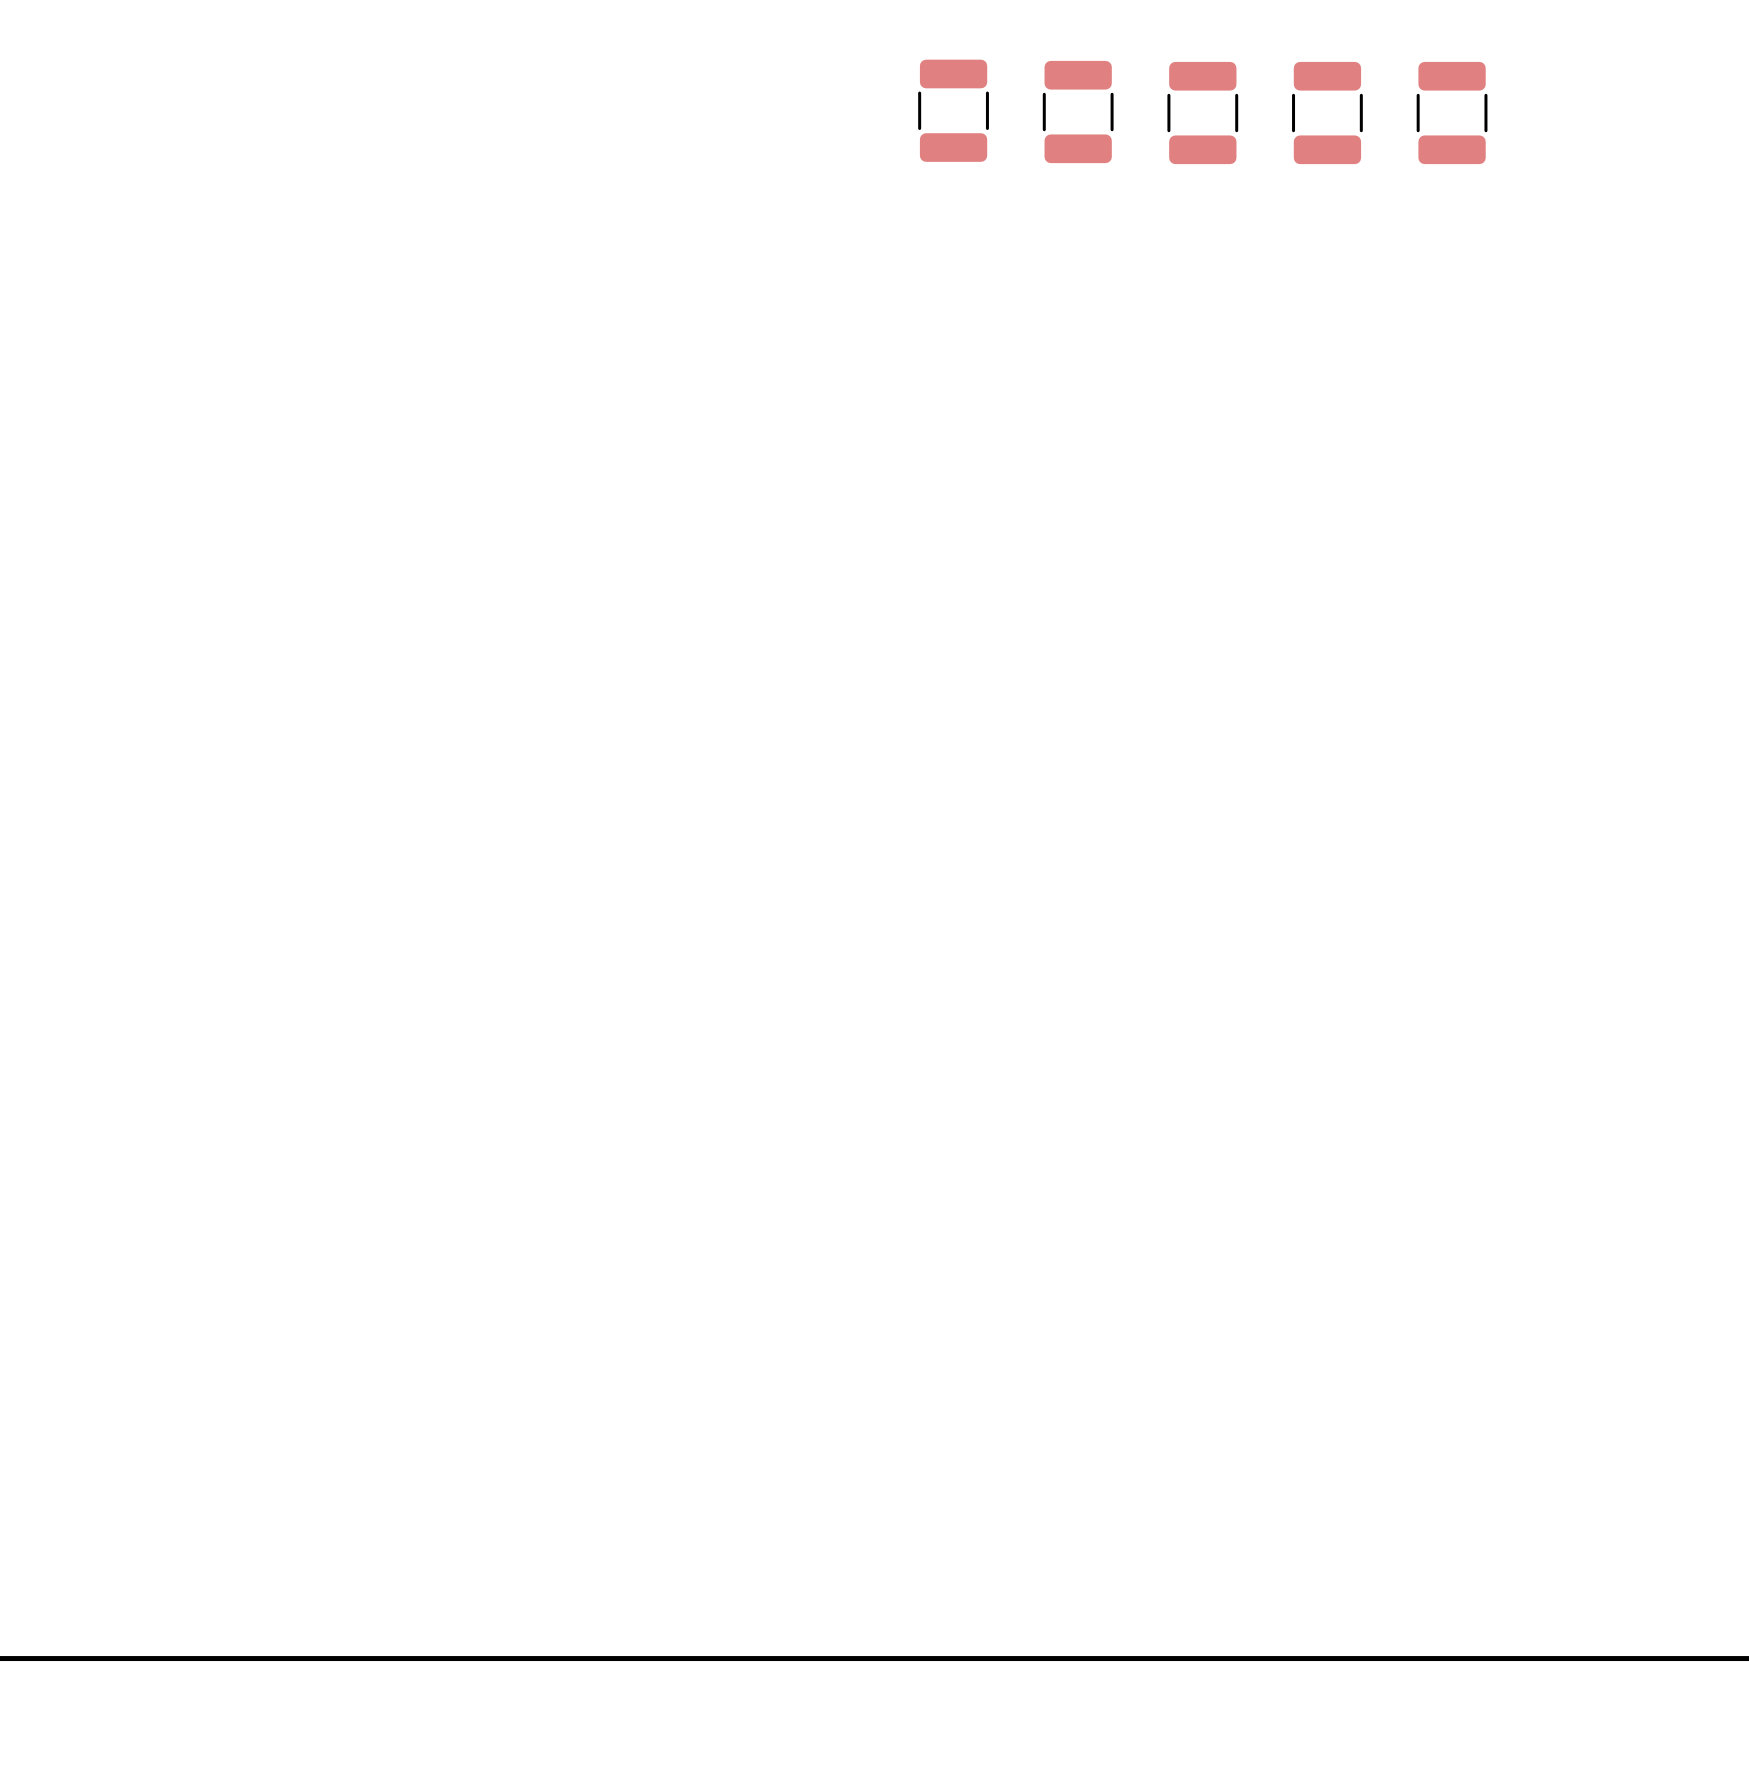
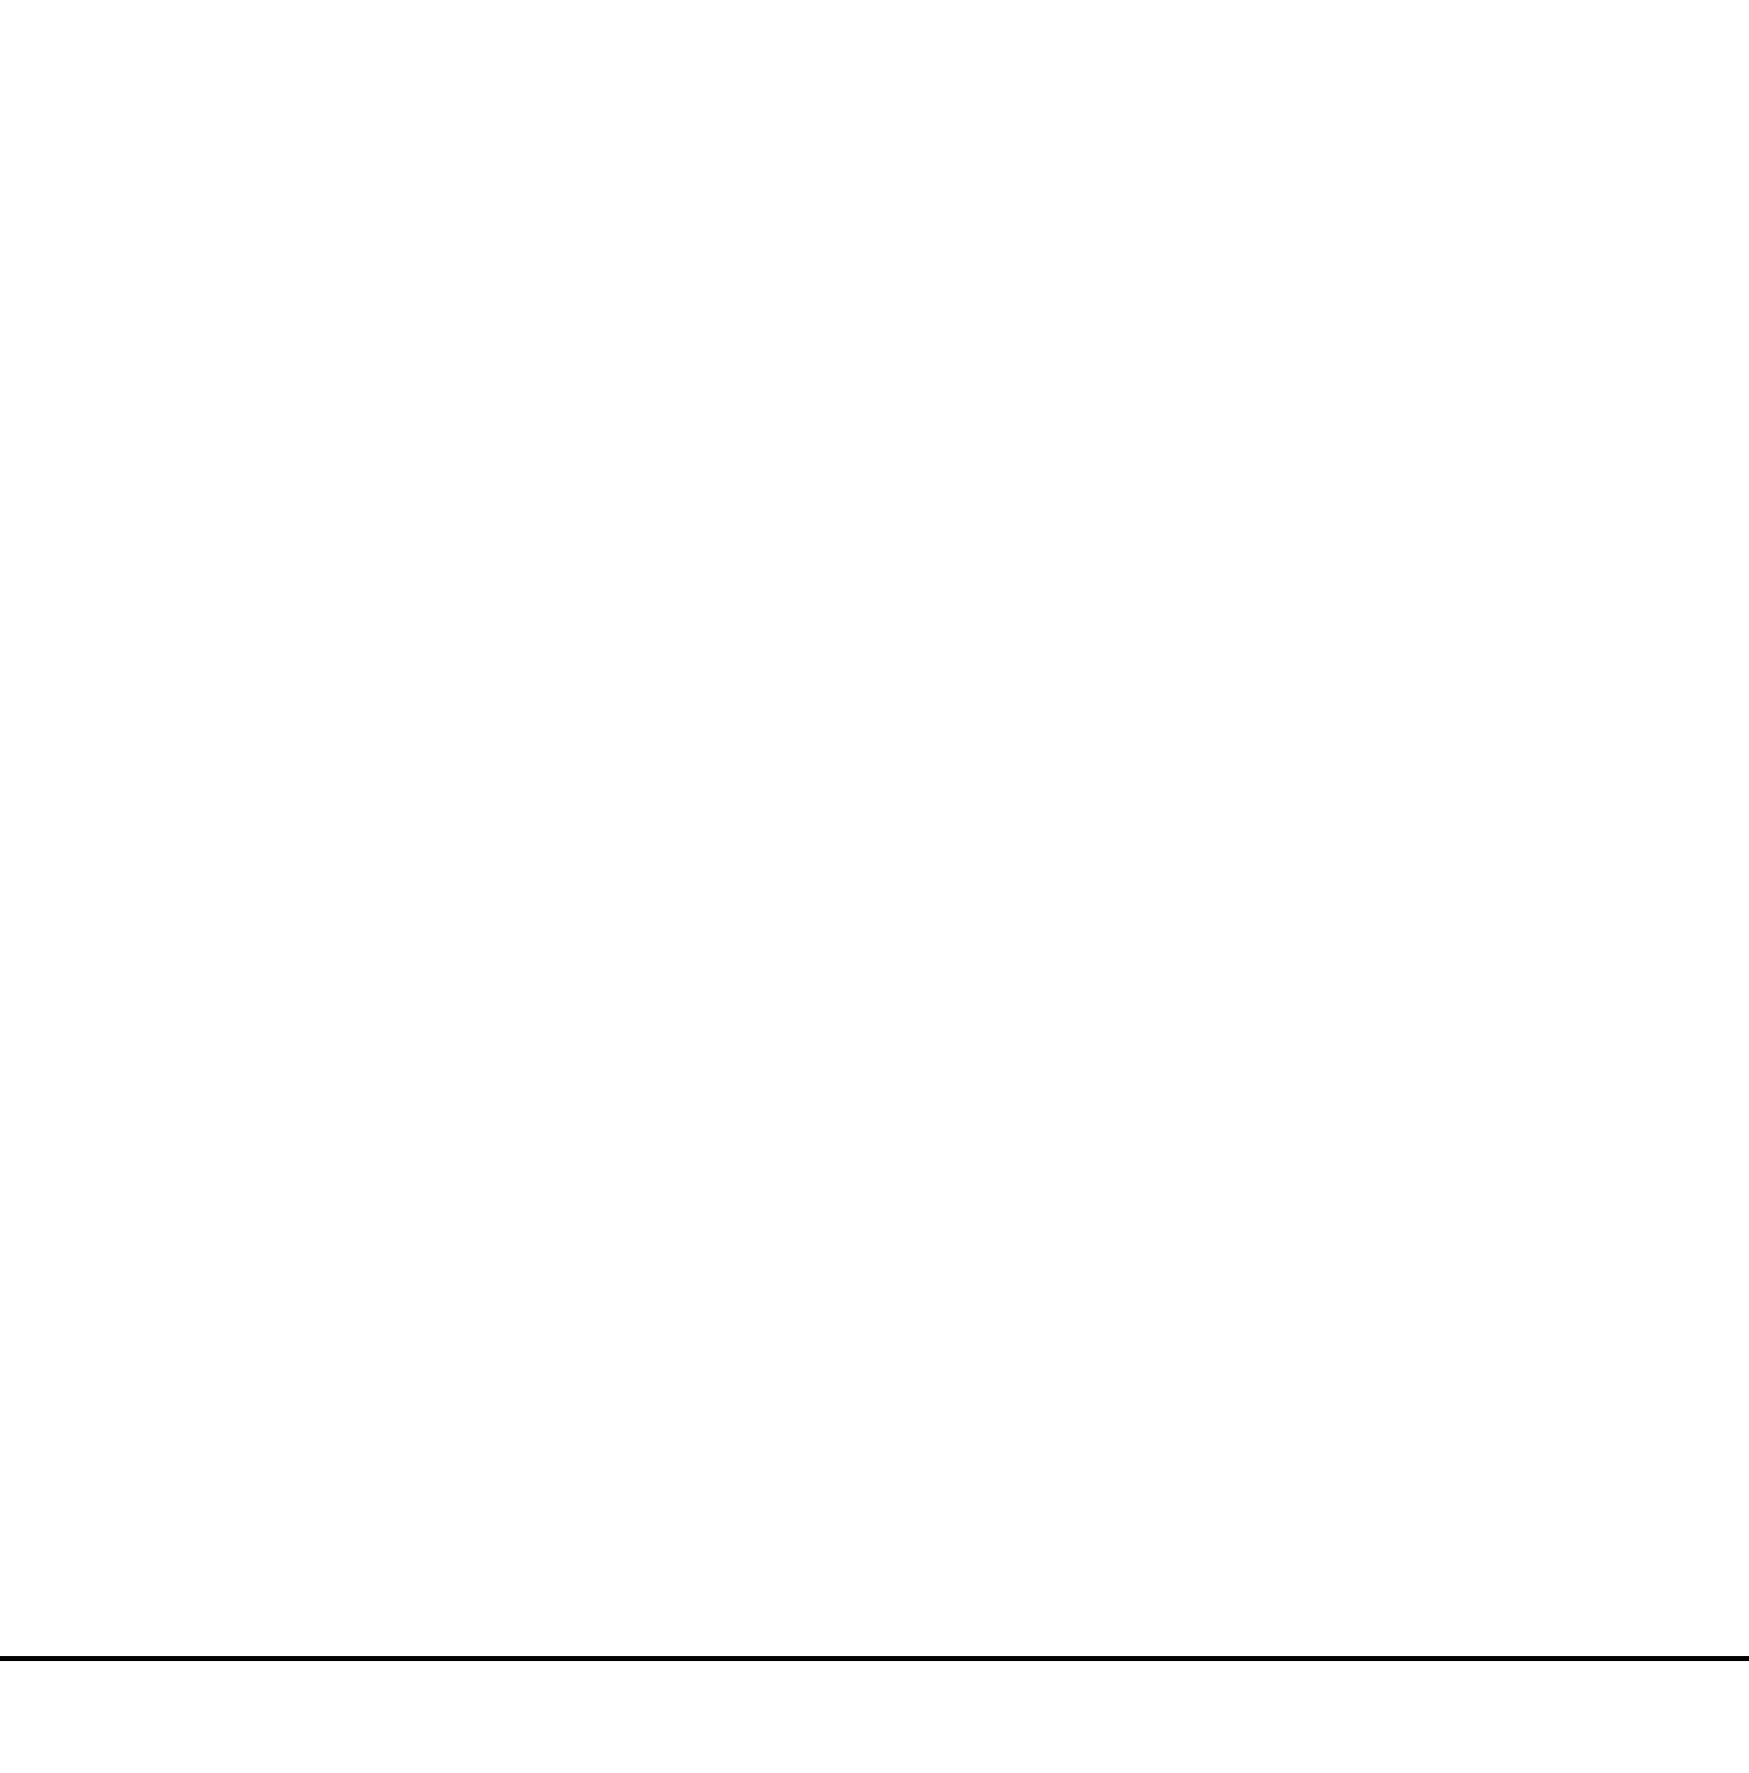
part: (953, 110) -> none
part: (1078, 112) -> none
part: (1202, 113) -> none
part: (1327, 113) -> none
part: (1452, 113) -> none

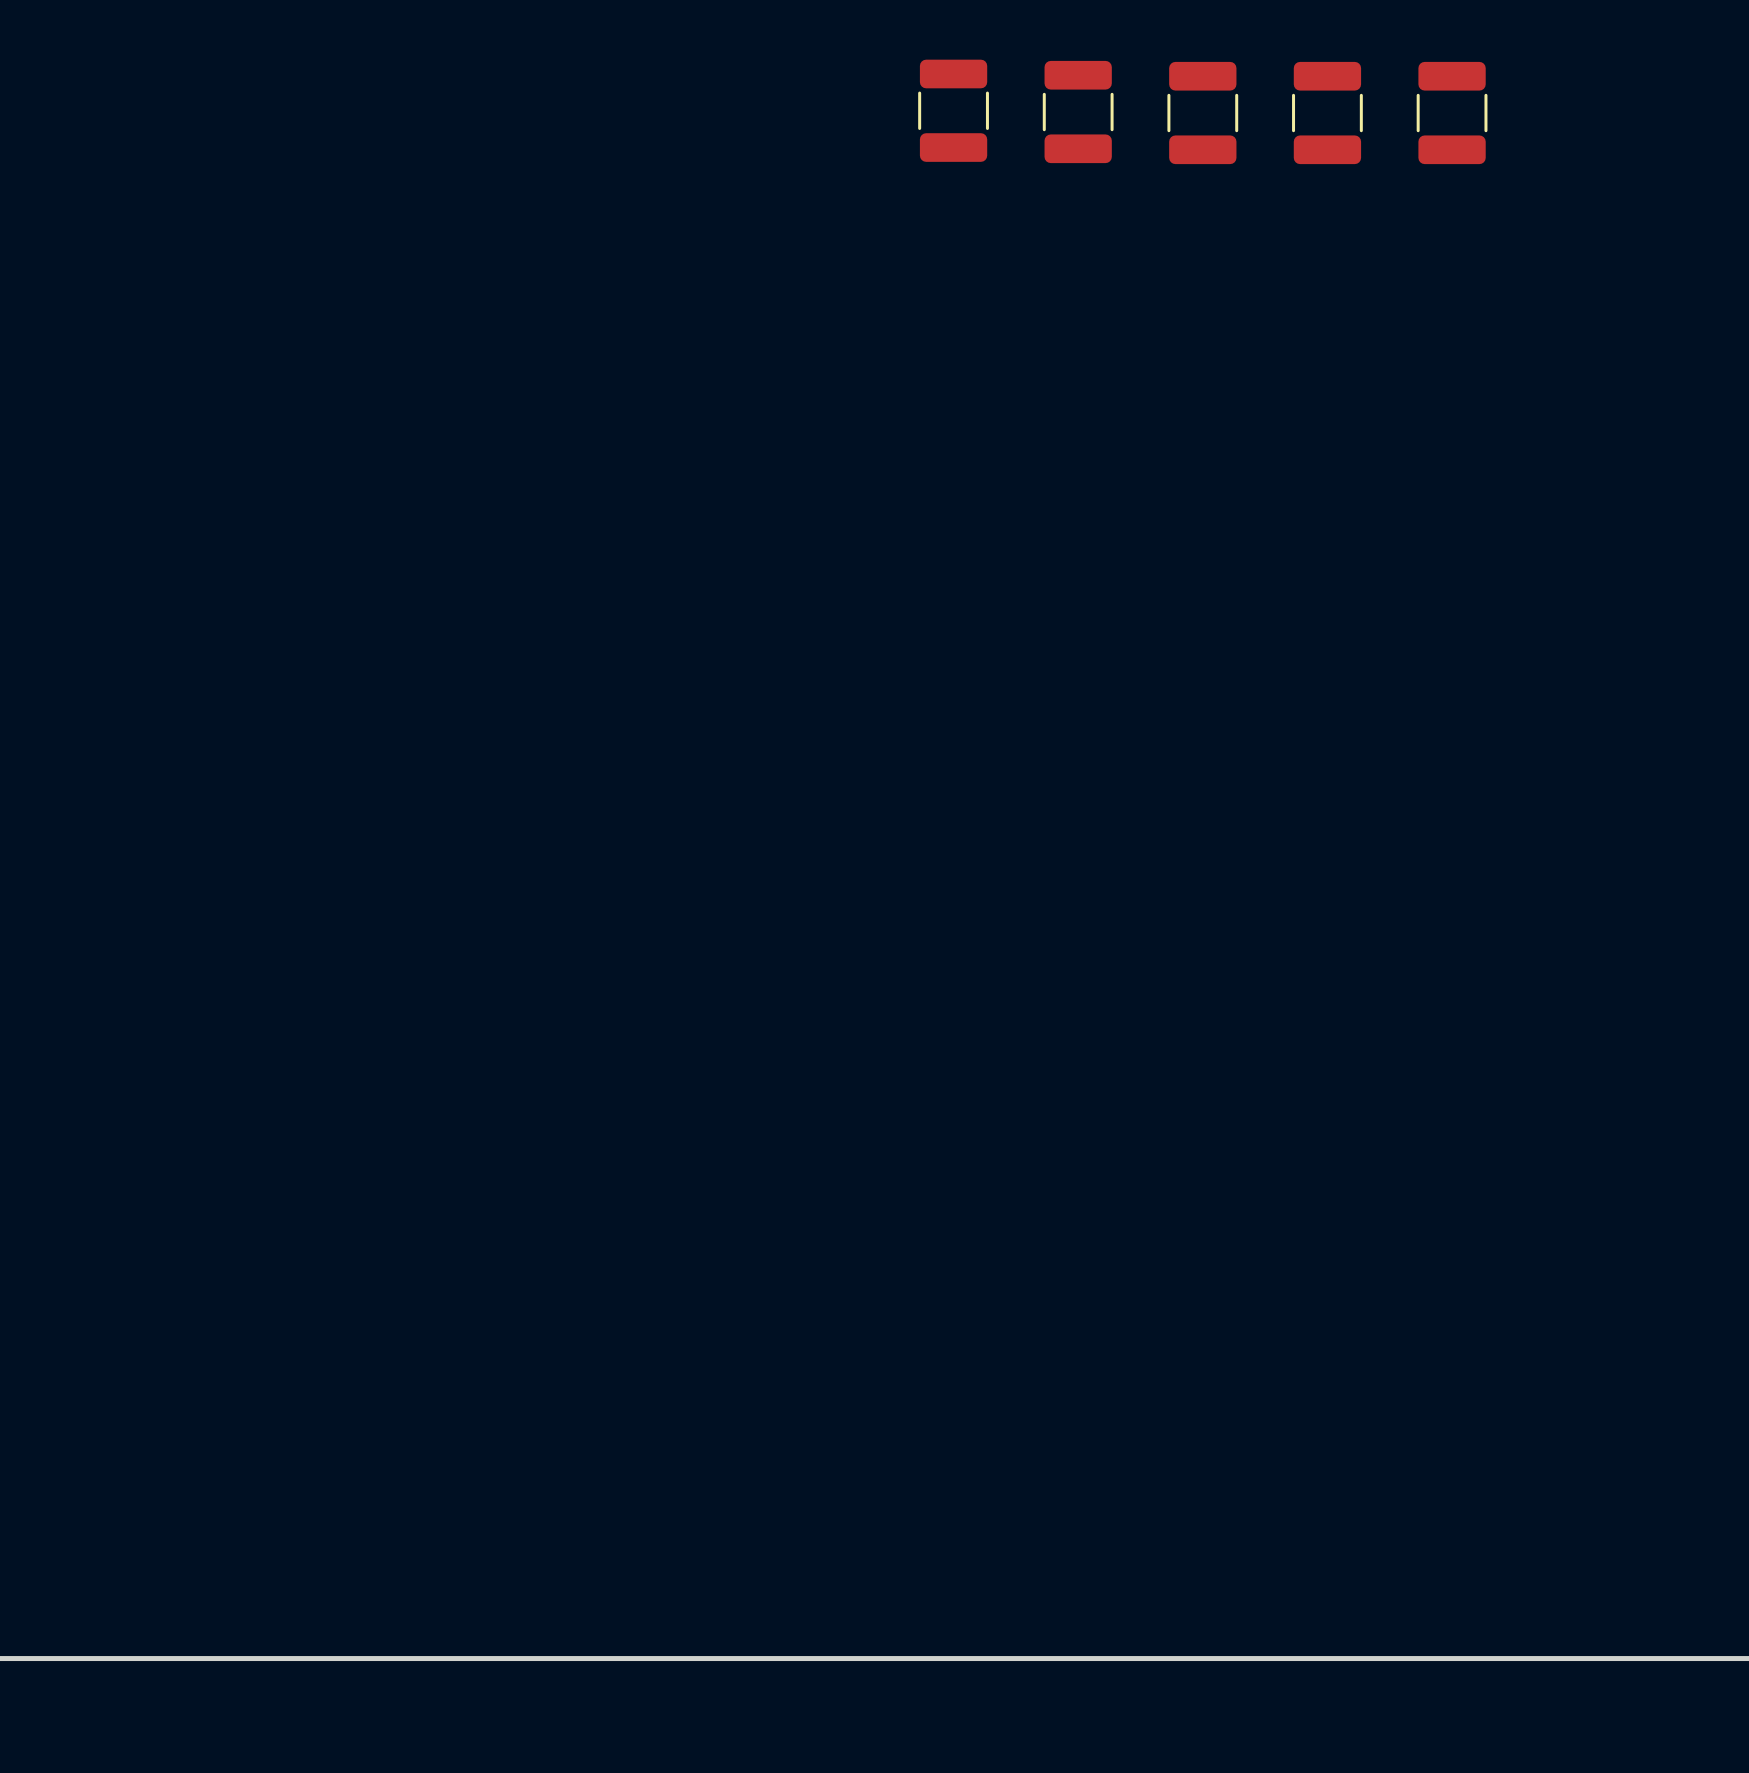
part: none -> (953, 110)
part: none -> (1078, 112)
part: none -> (1202, 113)
part: none -> (1327, 113)
part: none -> (1452, 113)

